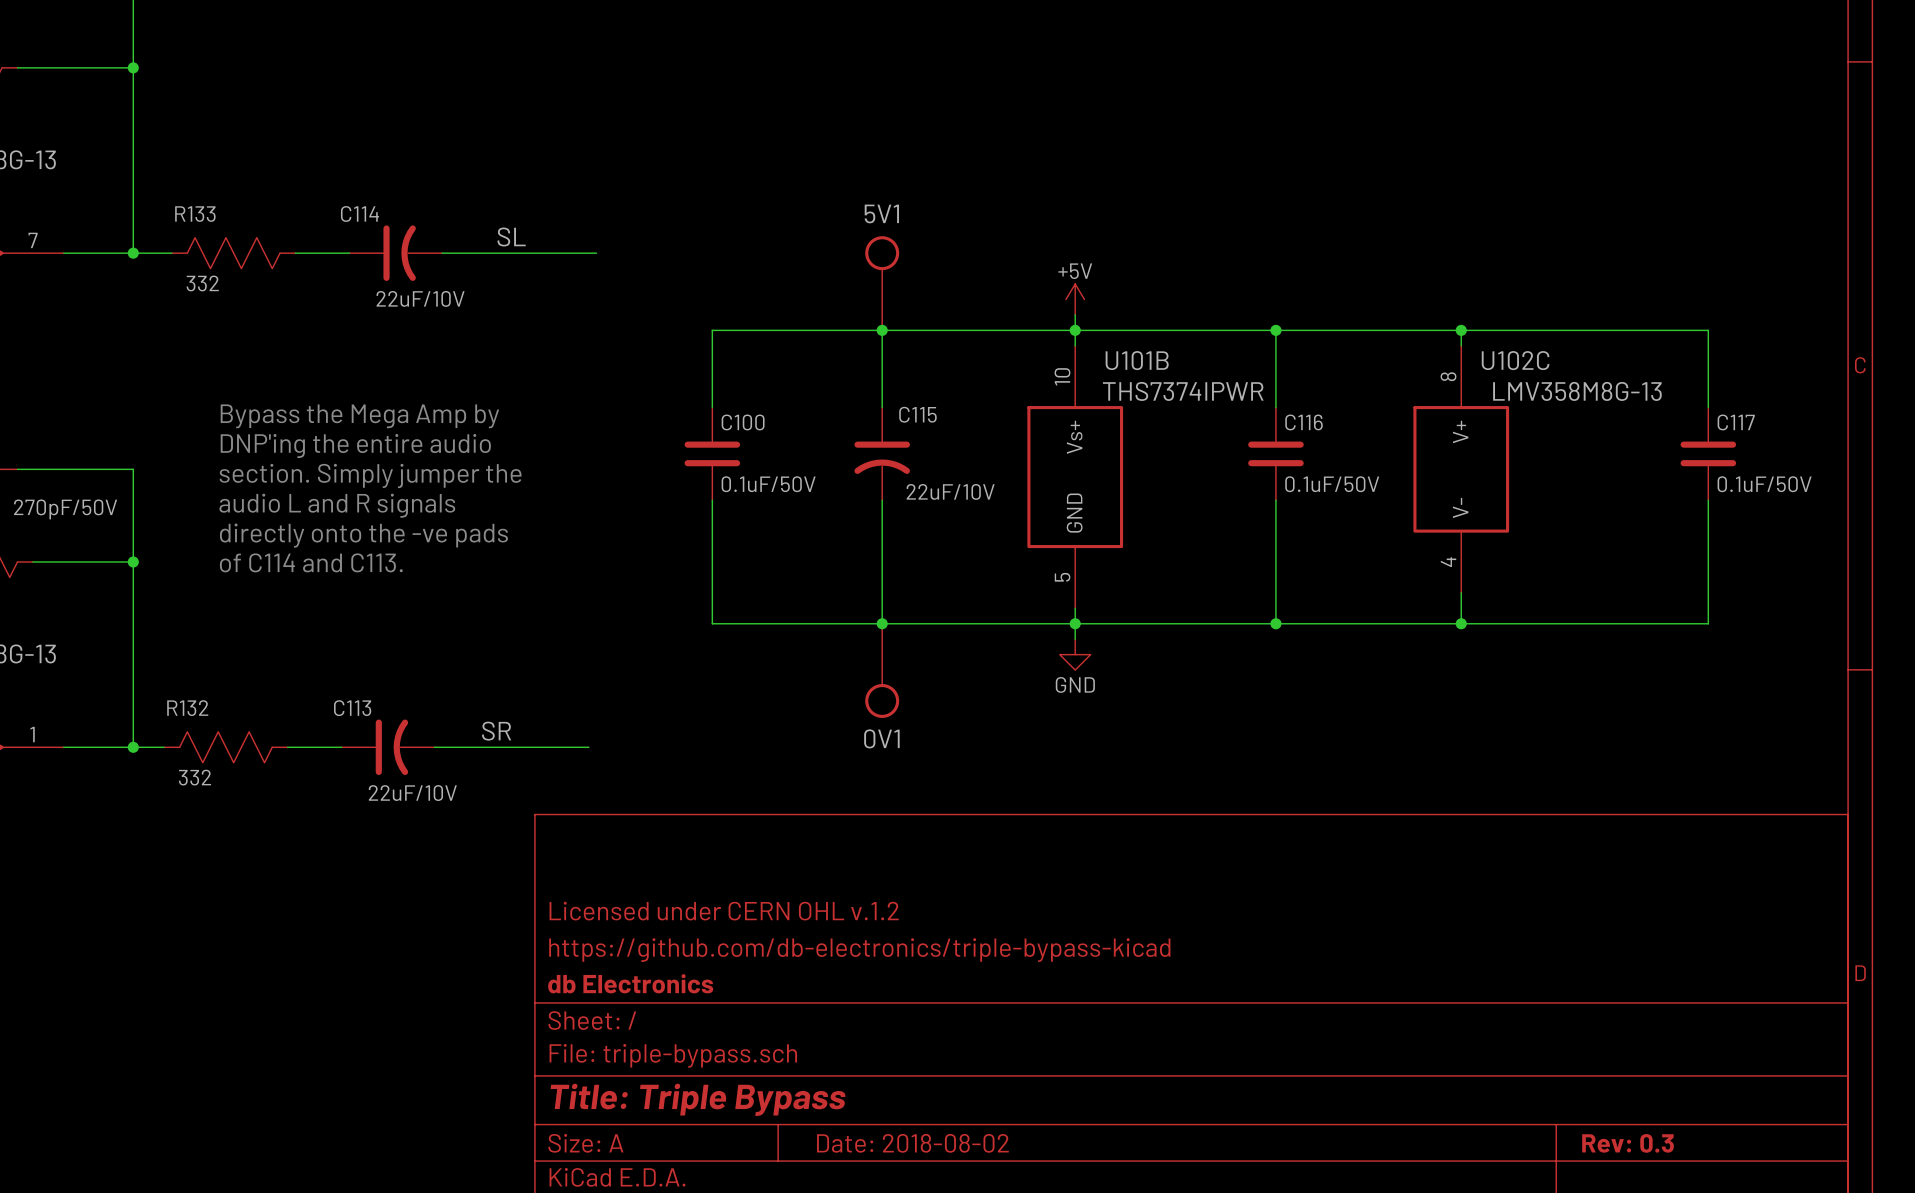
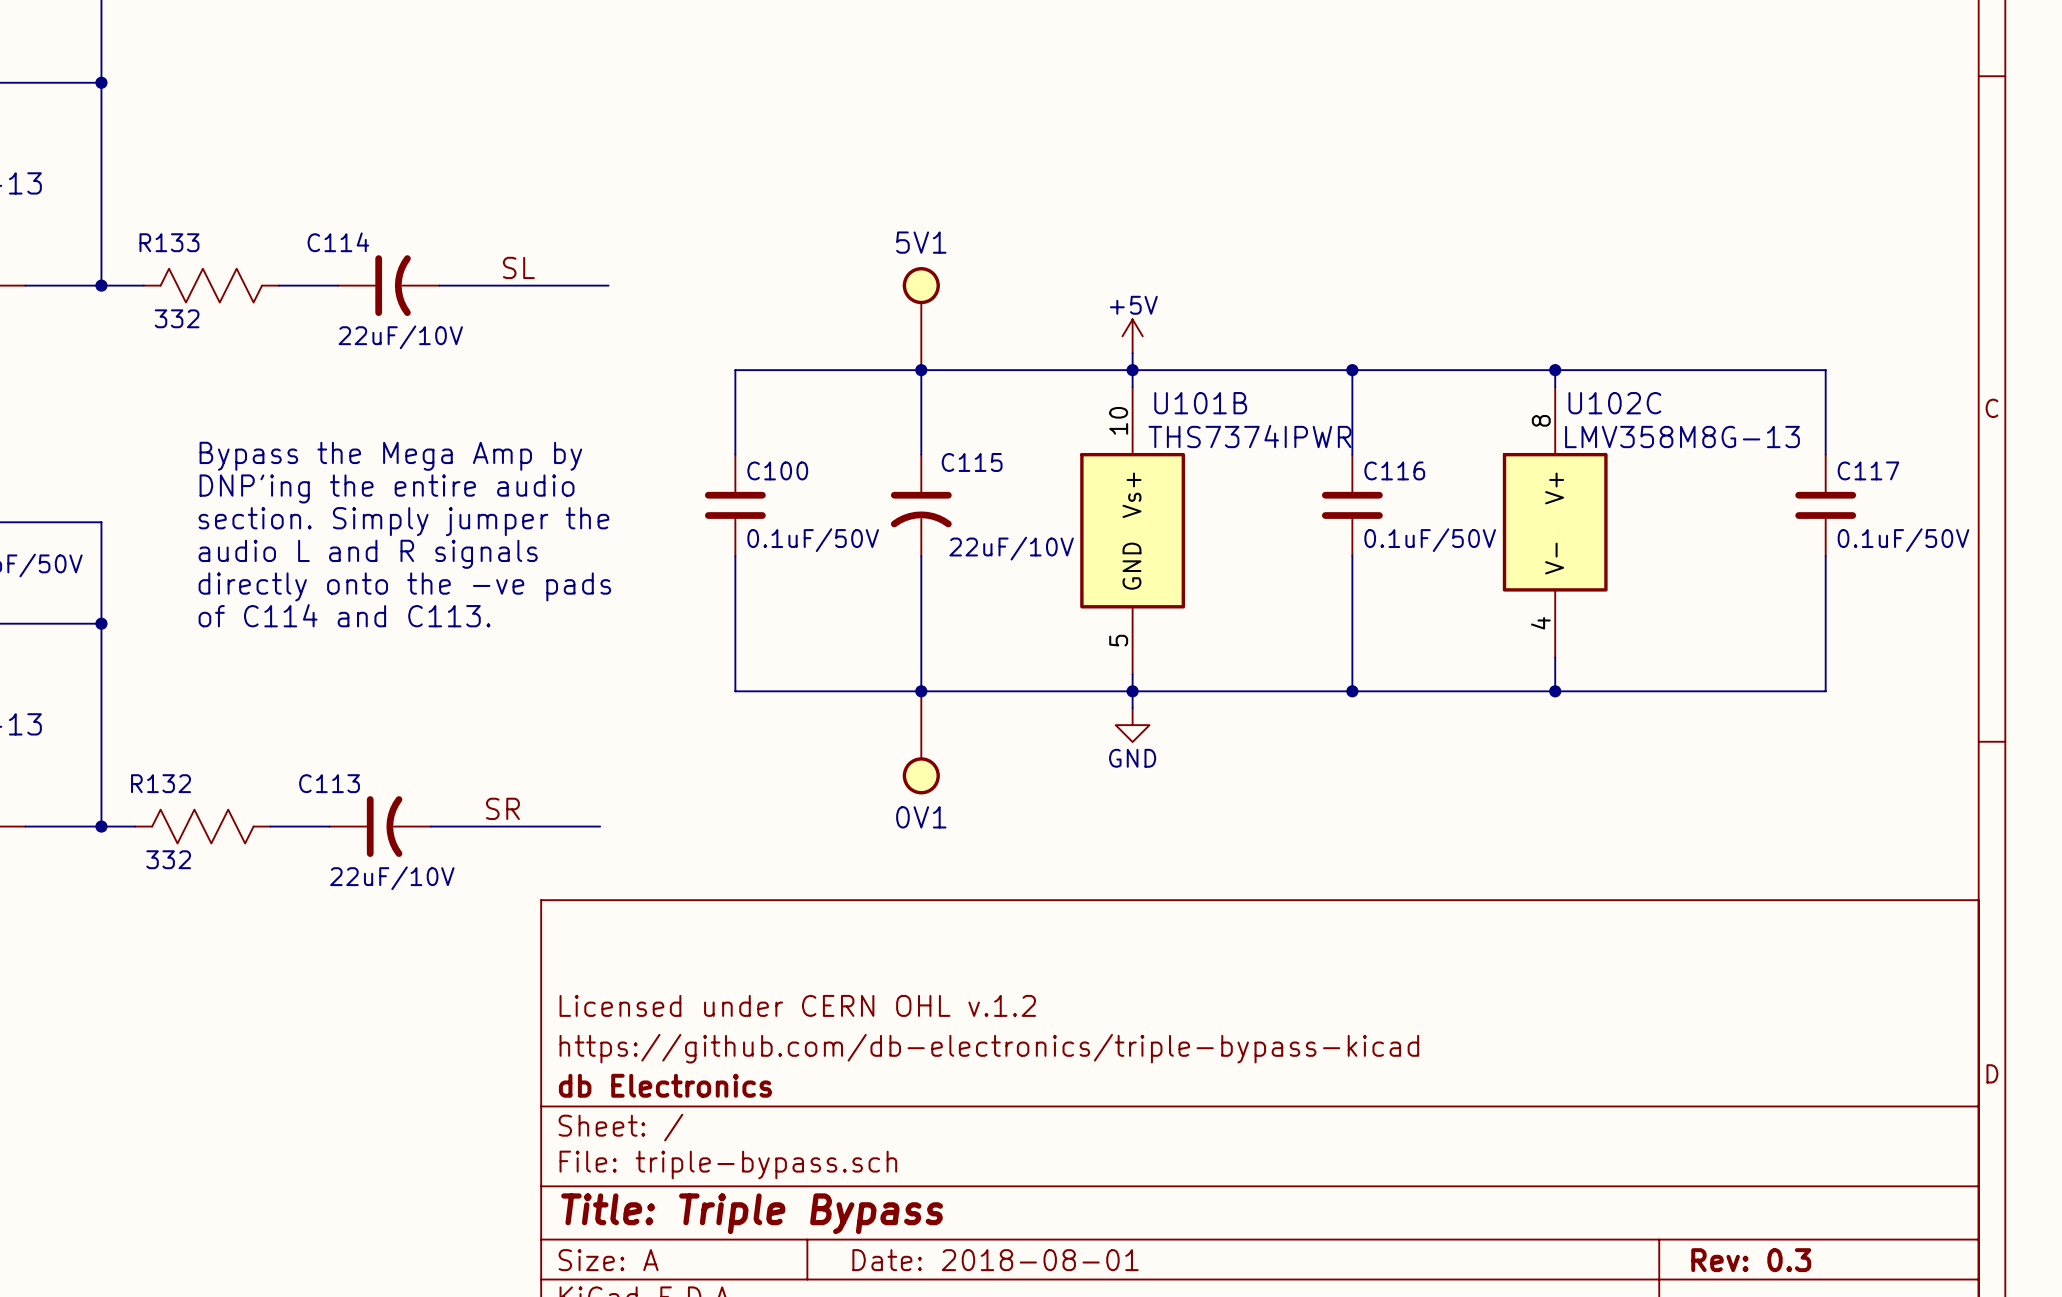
text position: Bypass the Mega Amp by (359, 416) -> Bypass the Mega Amp by (390, 456)
text position: DNP'ing the entire audio (355, 446) -> DNP'ing the entire audio (387, 488)
text position: section. Simply jumper the (370, 475) -> section. Simply jumper the (403, 521)
text position: audio L and R signals (337, 505) -> audio L and R signals (368, 554)
text position: directly onto the -ve pads (363, 535) -> directly onto the -ve pads (404, 586)
text position: of C114 and C113. (311, 562) -> of C114 and C113. (344, 615)
title block: Date: 2018-08-02 (912, 1143) -> Date: 2018-08-01 (995, 1260)

